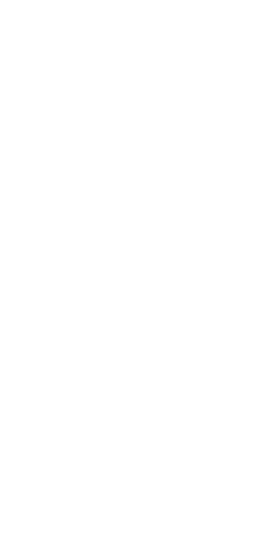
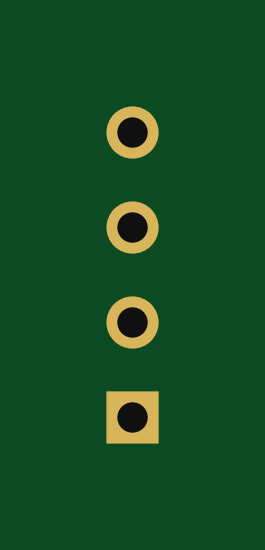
part: none -> (132, 275)

